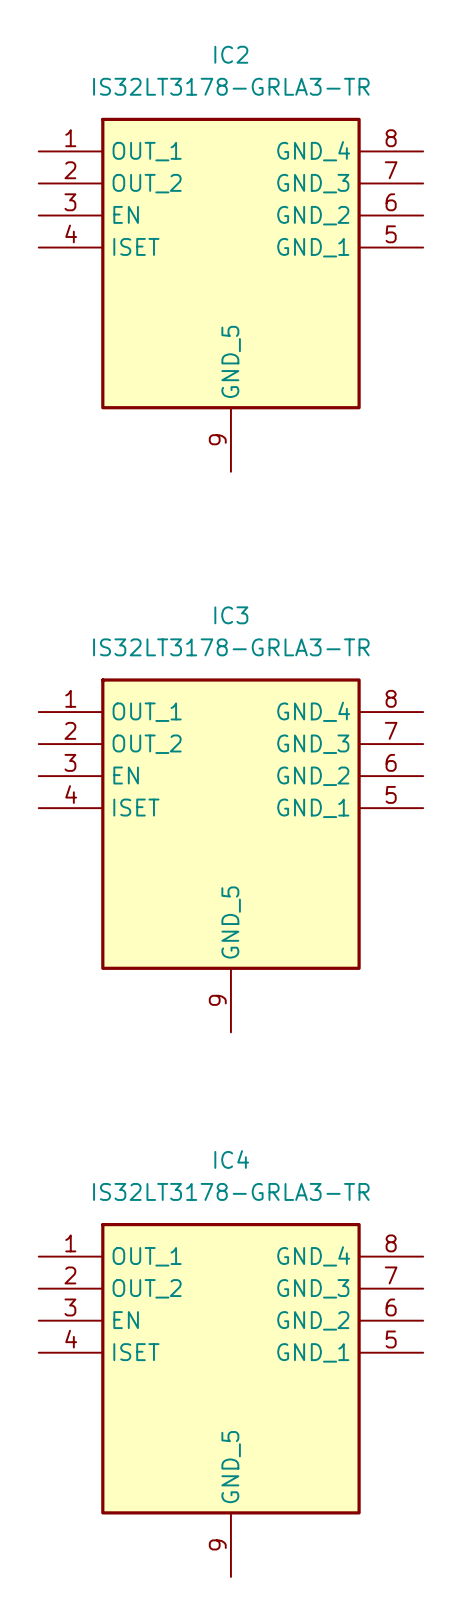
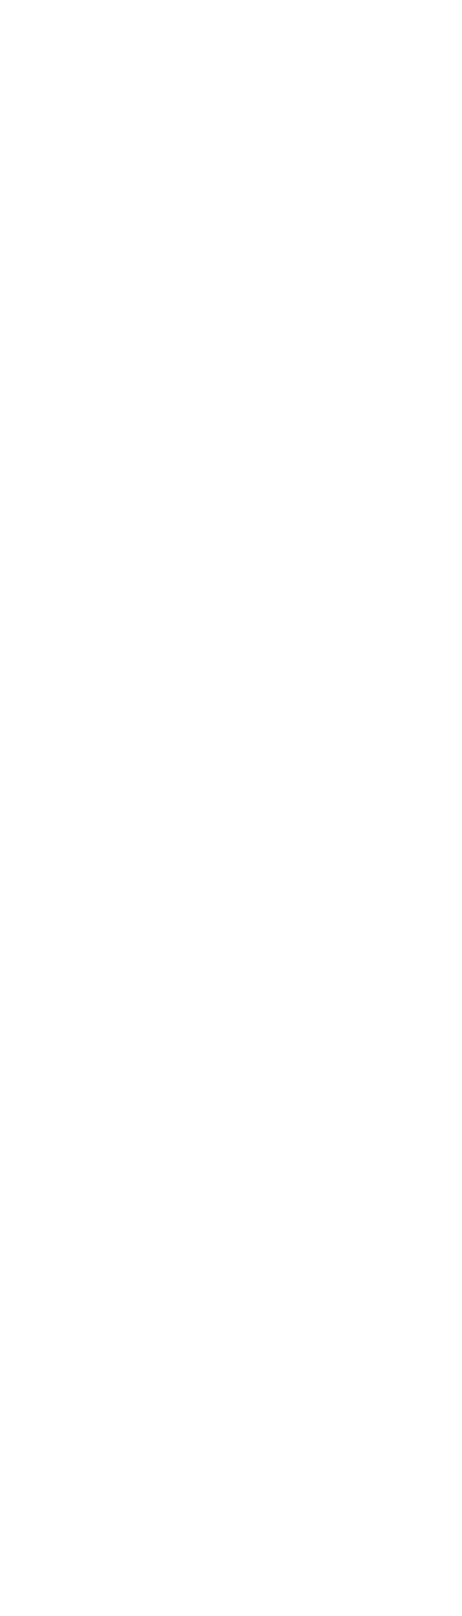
IC2: IS32LT3178-GRLA3-TR (230, 294) -> none
IC3: IS32LT3178-GRLA3-TR (230, 855) -> none
IC4: IS32LT3178-GRLA3-TR (230, 1399) -> none

